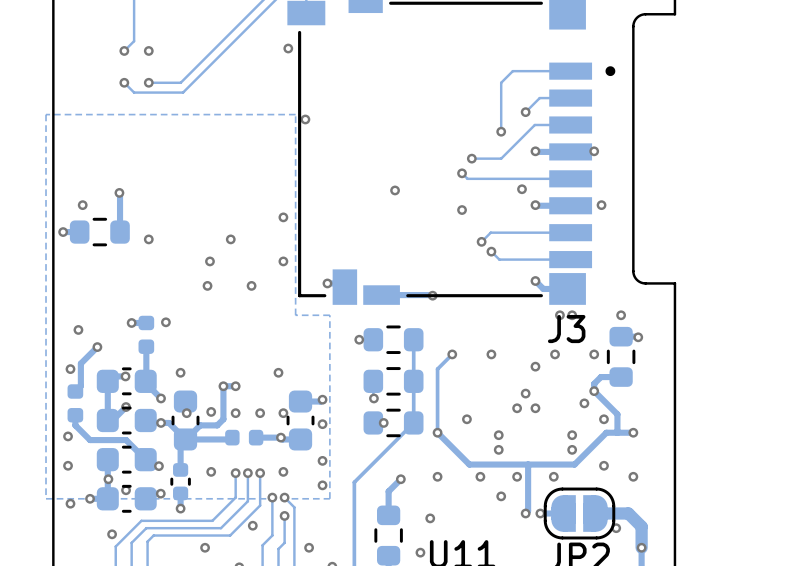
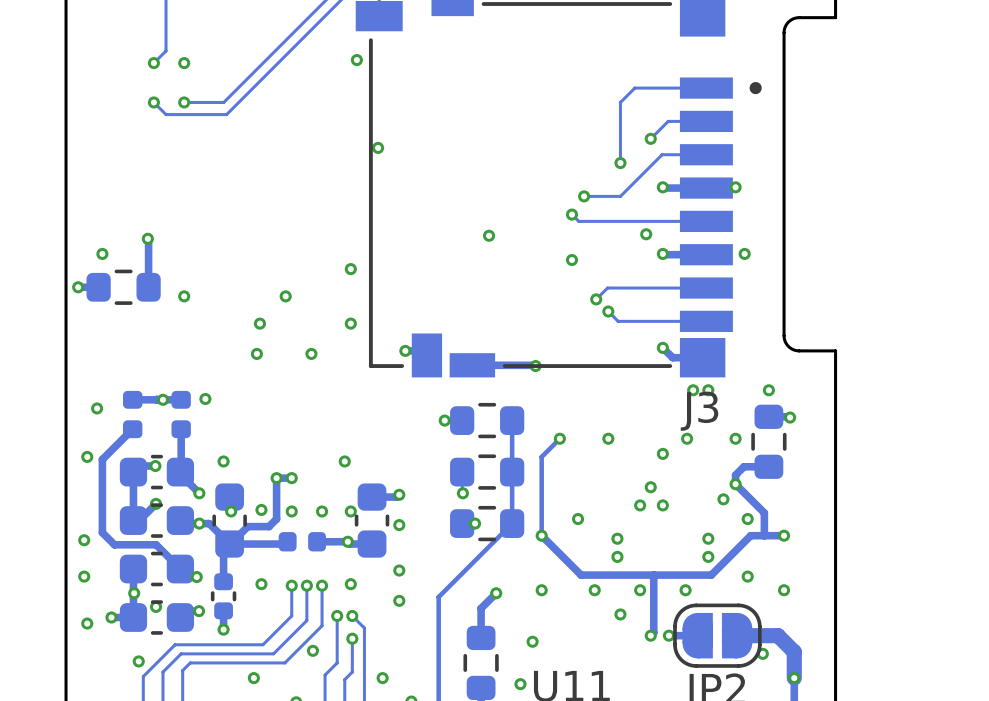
zone outline: (295, 114) (295, 315) (329, 315) (329, 498) (46, 498) (46, 114) (295, 114) -> none
track: none -> (162, 399) (132, 399)
track: (97, 347) (80, 363) (80, 385) (75, 391) -> none
via: (97, 347) -> none
part position: (75, 403) -> (132, 414)
track: (75, 415) (75, 425) (90, 440) (92, 440) -> (132, 429) (102, 459) (102, 532) (114, 544)

